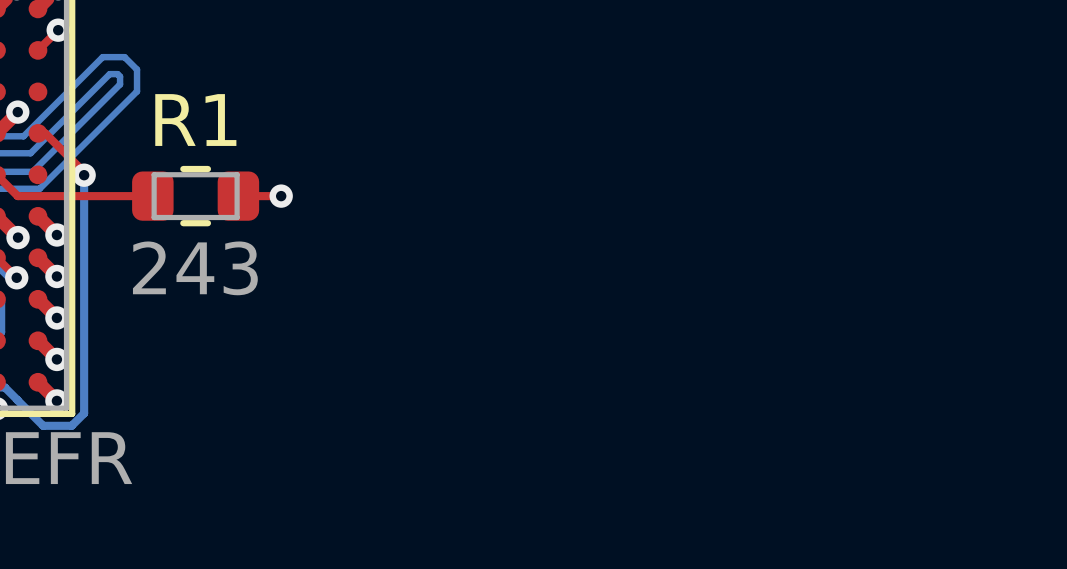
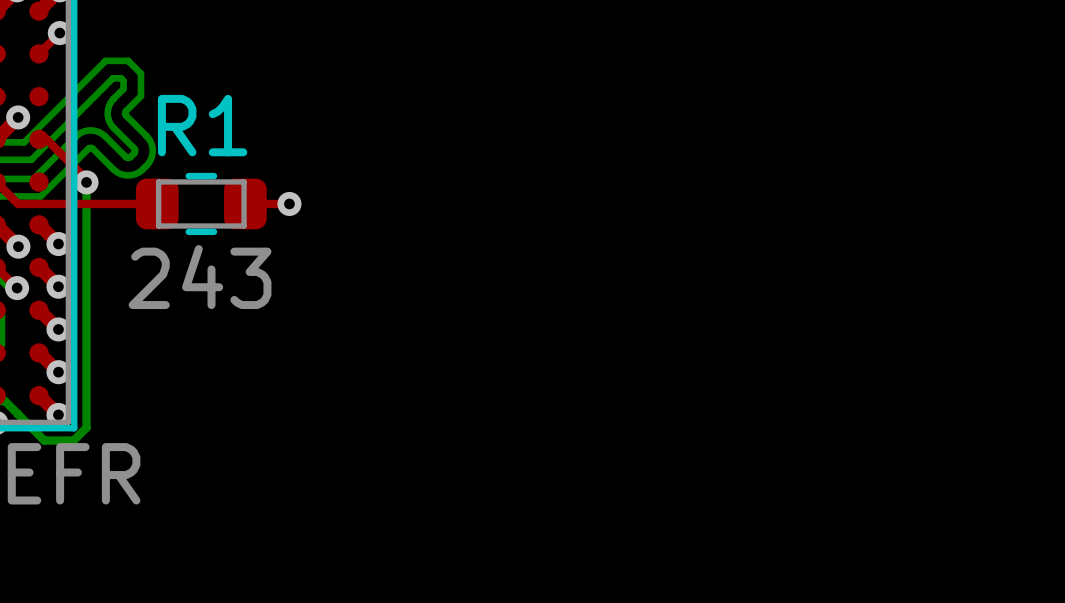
bottom track: (110, 93) (73, 130) -> (113, 98) (108, 107) (108, 118) (111, 126) (134, 149) (134, 152) (130, 156) (126, 157) (98, 132) (87, 130) (75, 136)
bottom track: (122, 105) (85, 142) -> (126, 111) (125, 115) (148, 138) (152, 145) (151, 158) (142, 169) (133, 174) (120, 173) (92, 148) (88, 148)

